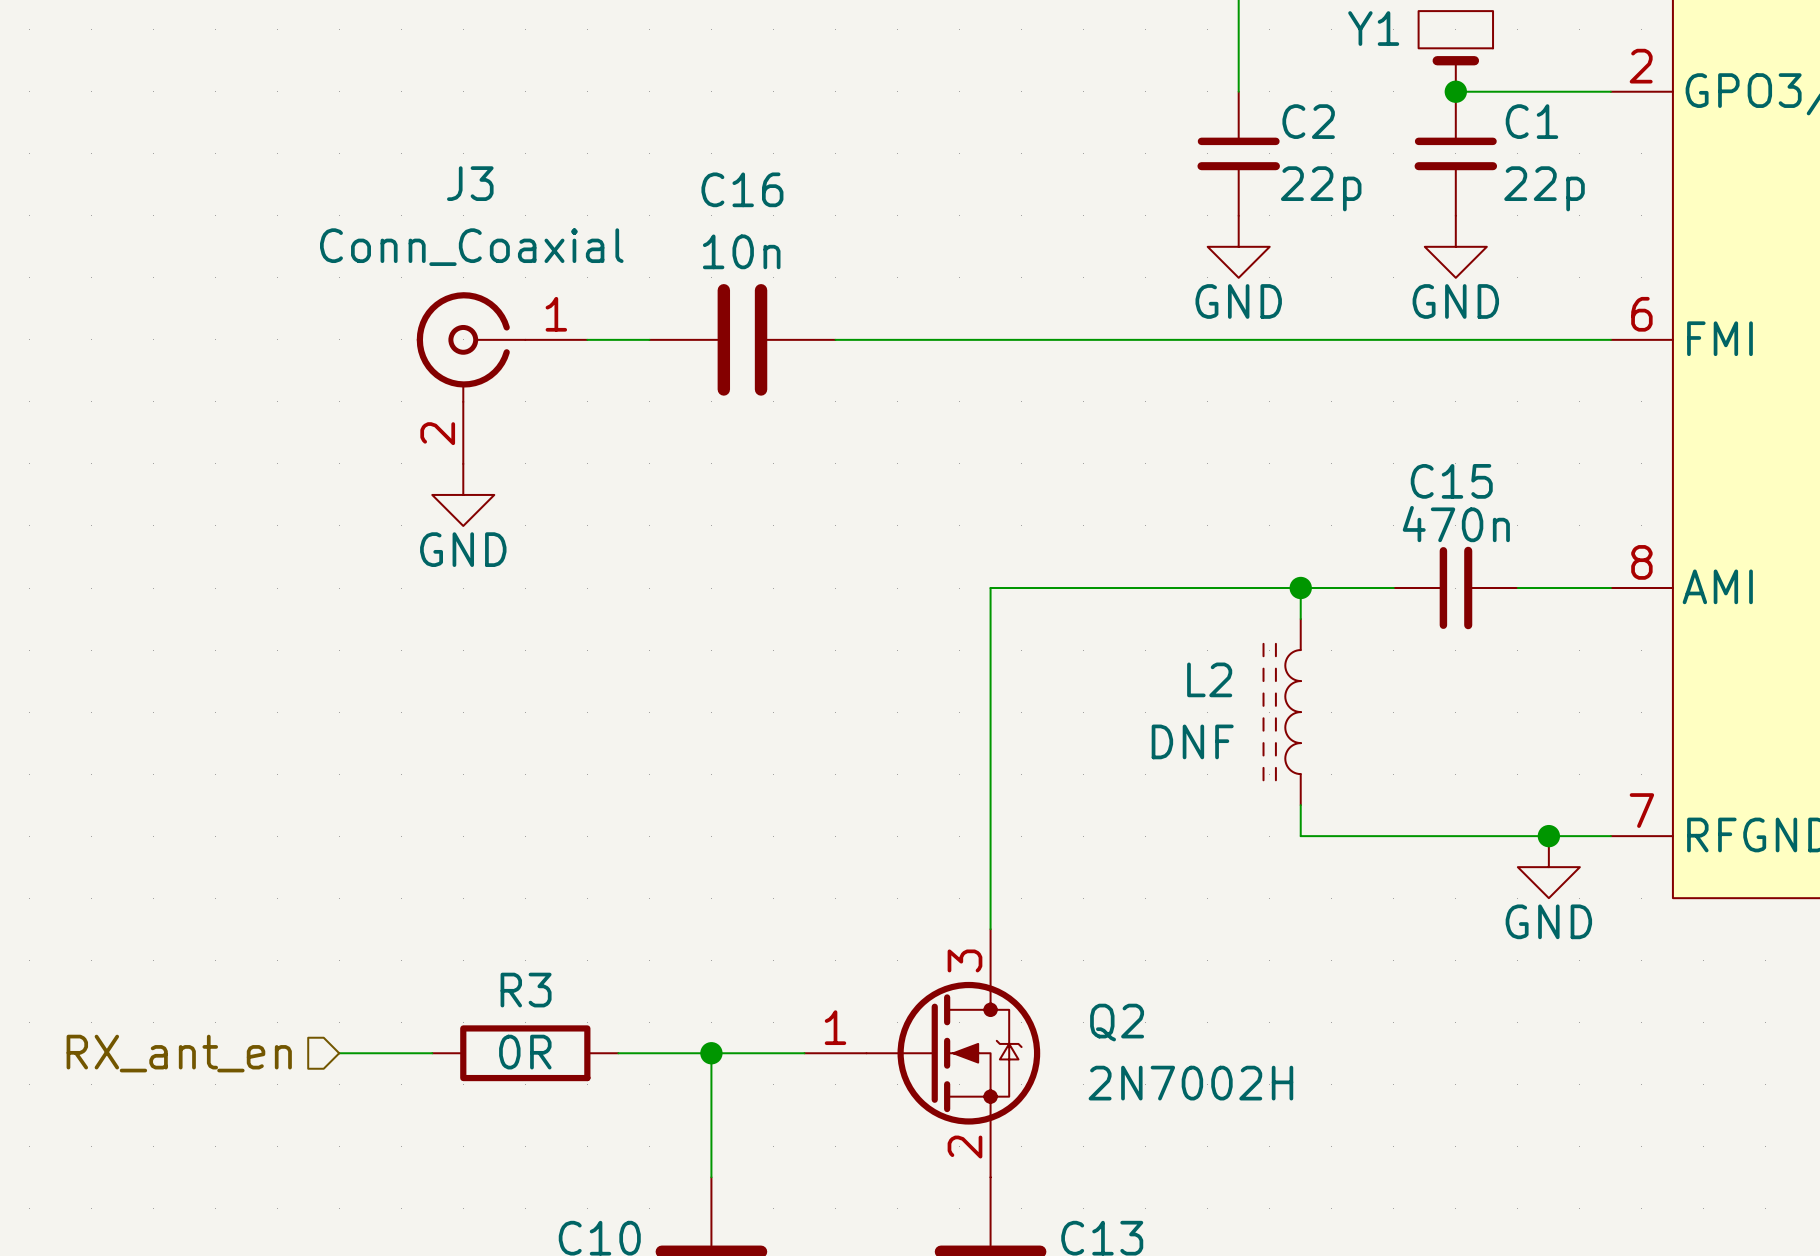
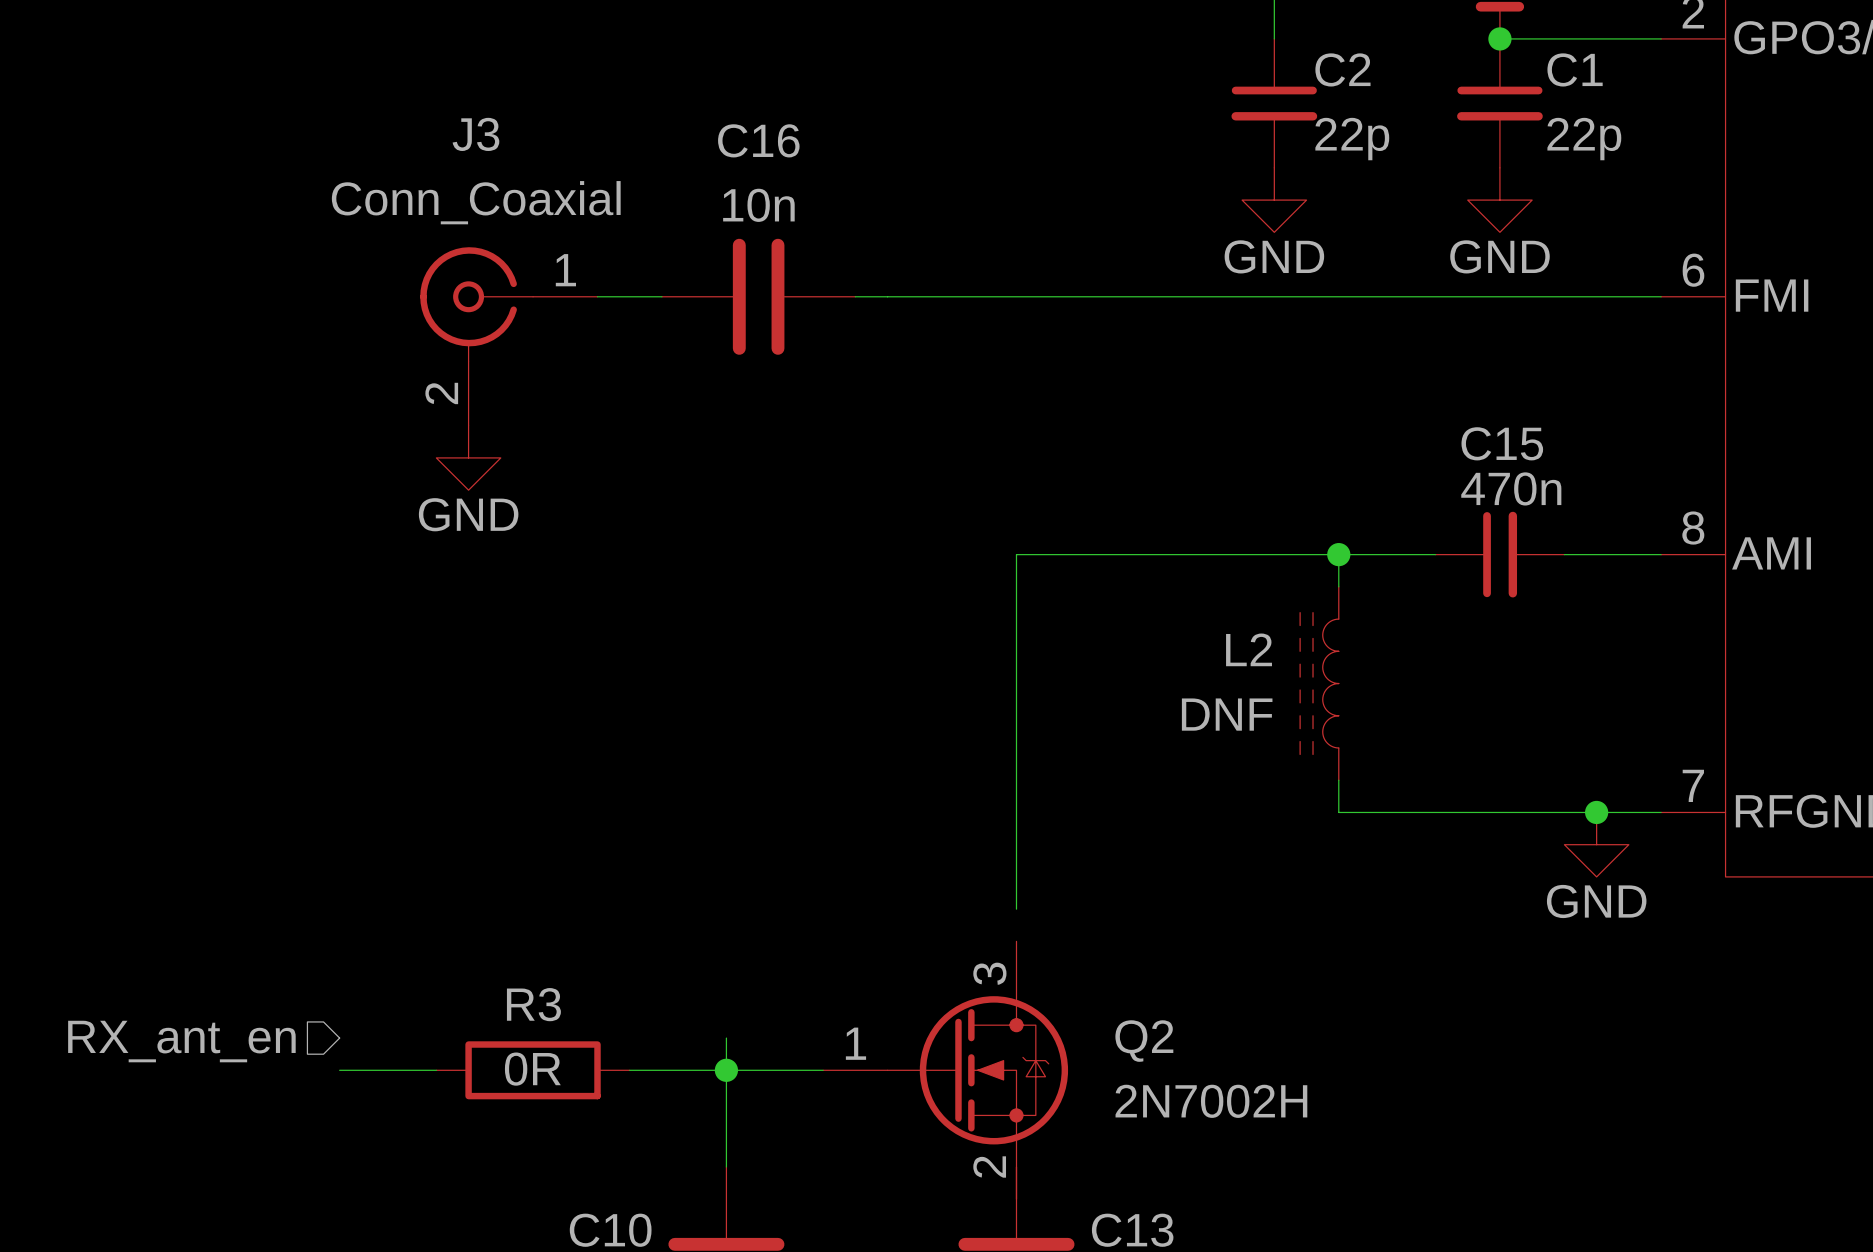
wire: (339, 1053) (432, 1053) -> (339, 1070) (436, 1070)
R3 position: (525, 1053) -> (533, 1070)
wire: (618, 1053) (804, 1053) -> (629, 1070) (823, 1070)
junction position: (711, 1053) -> (726, 1070)
Q2 position: (922, 1053) -> (945, 1070)

